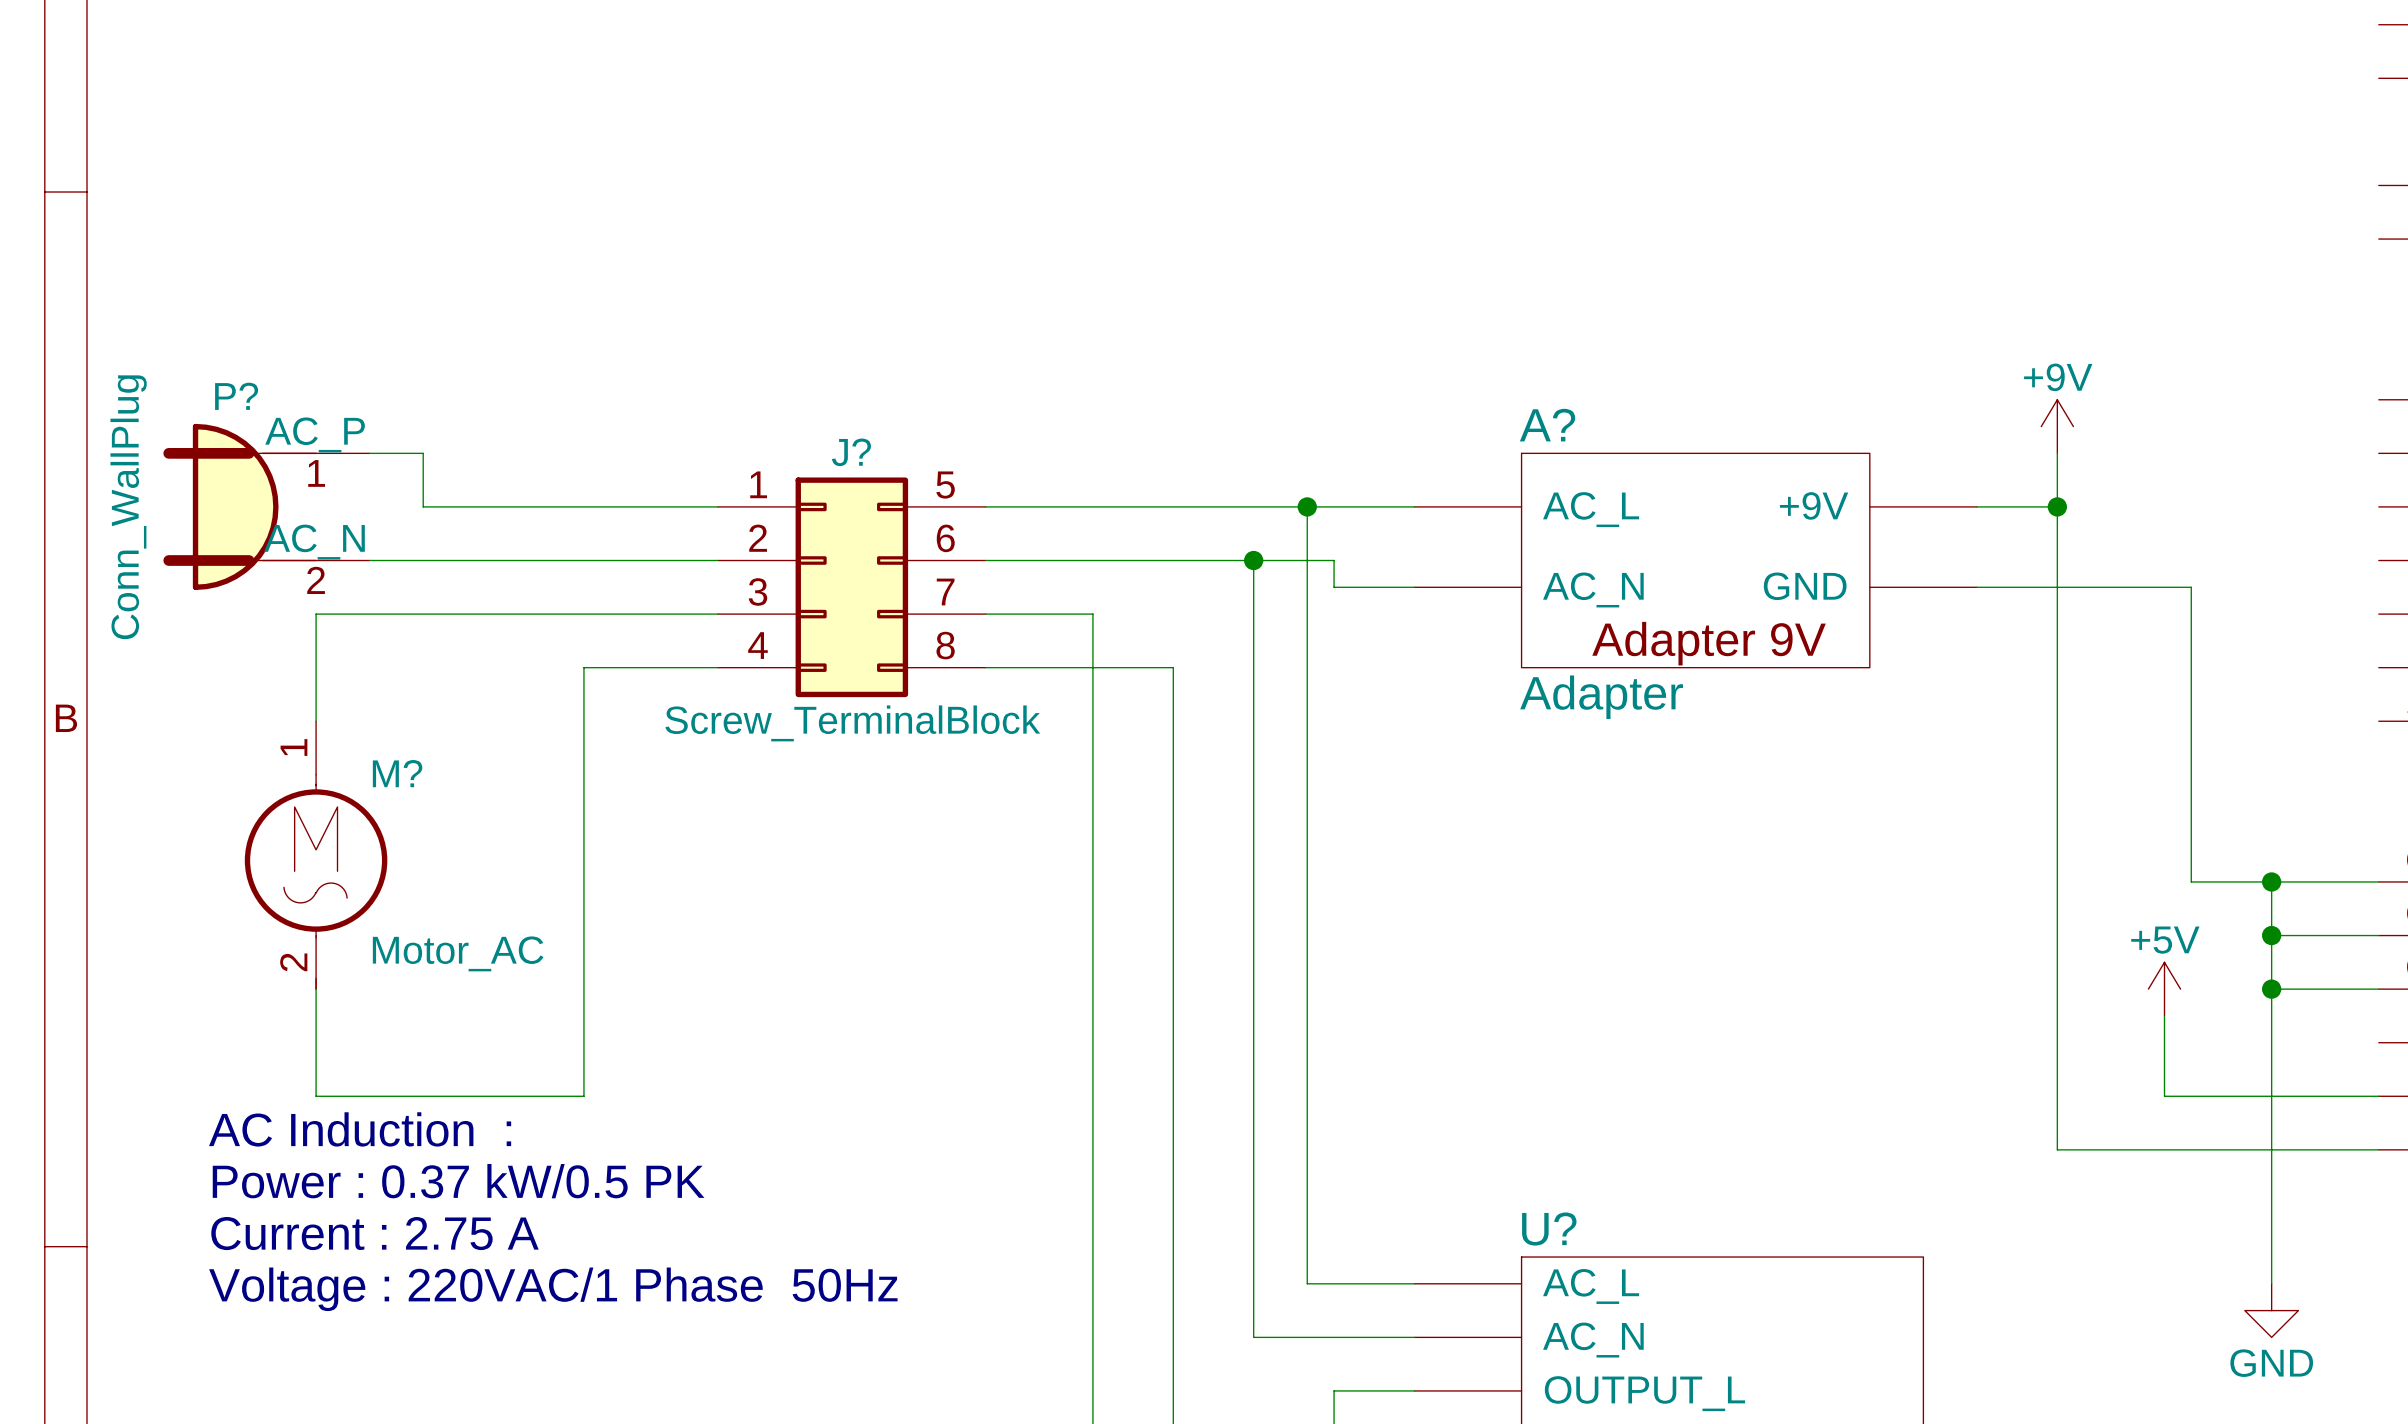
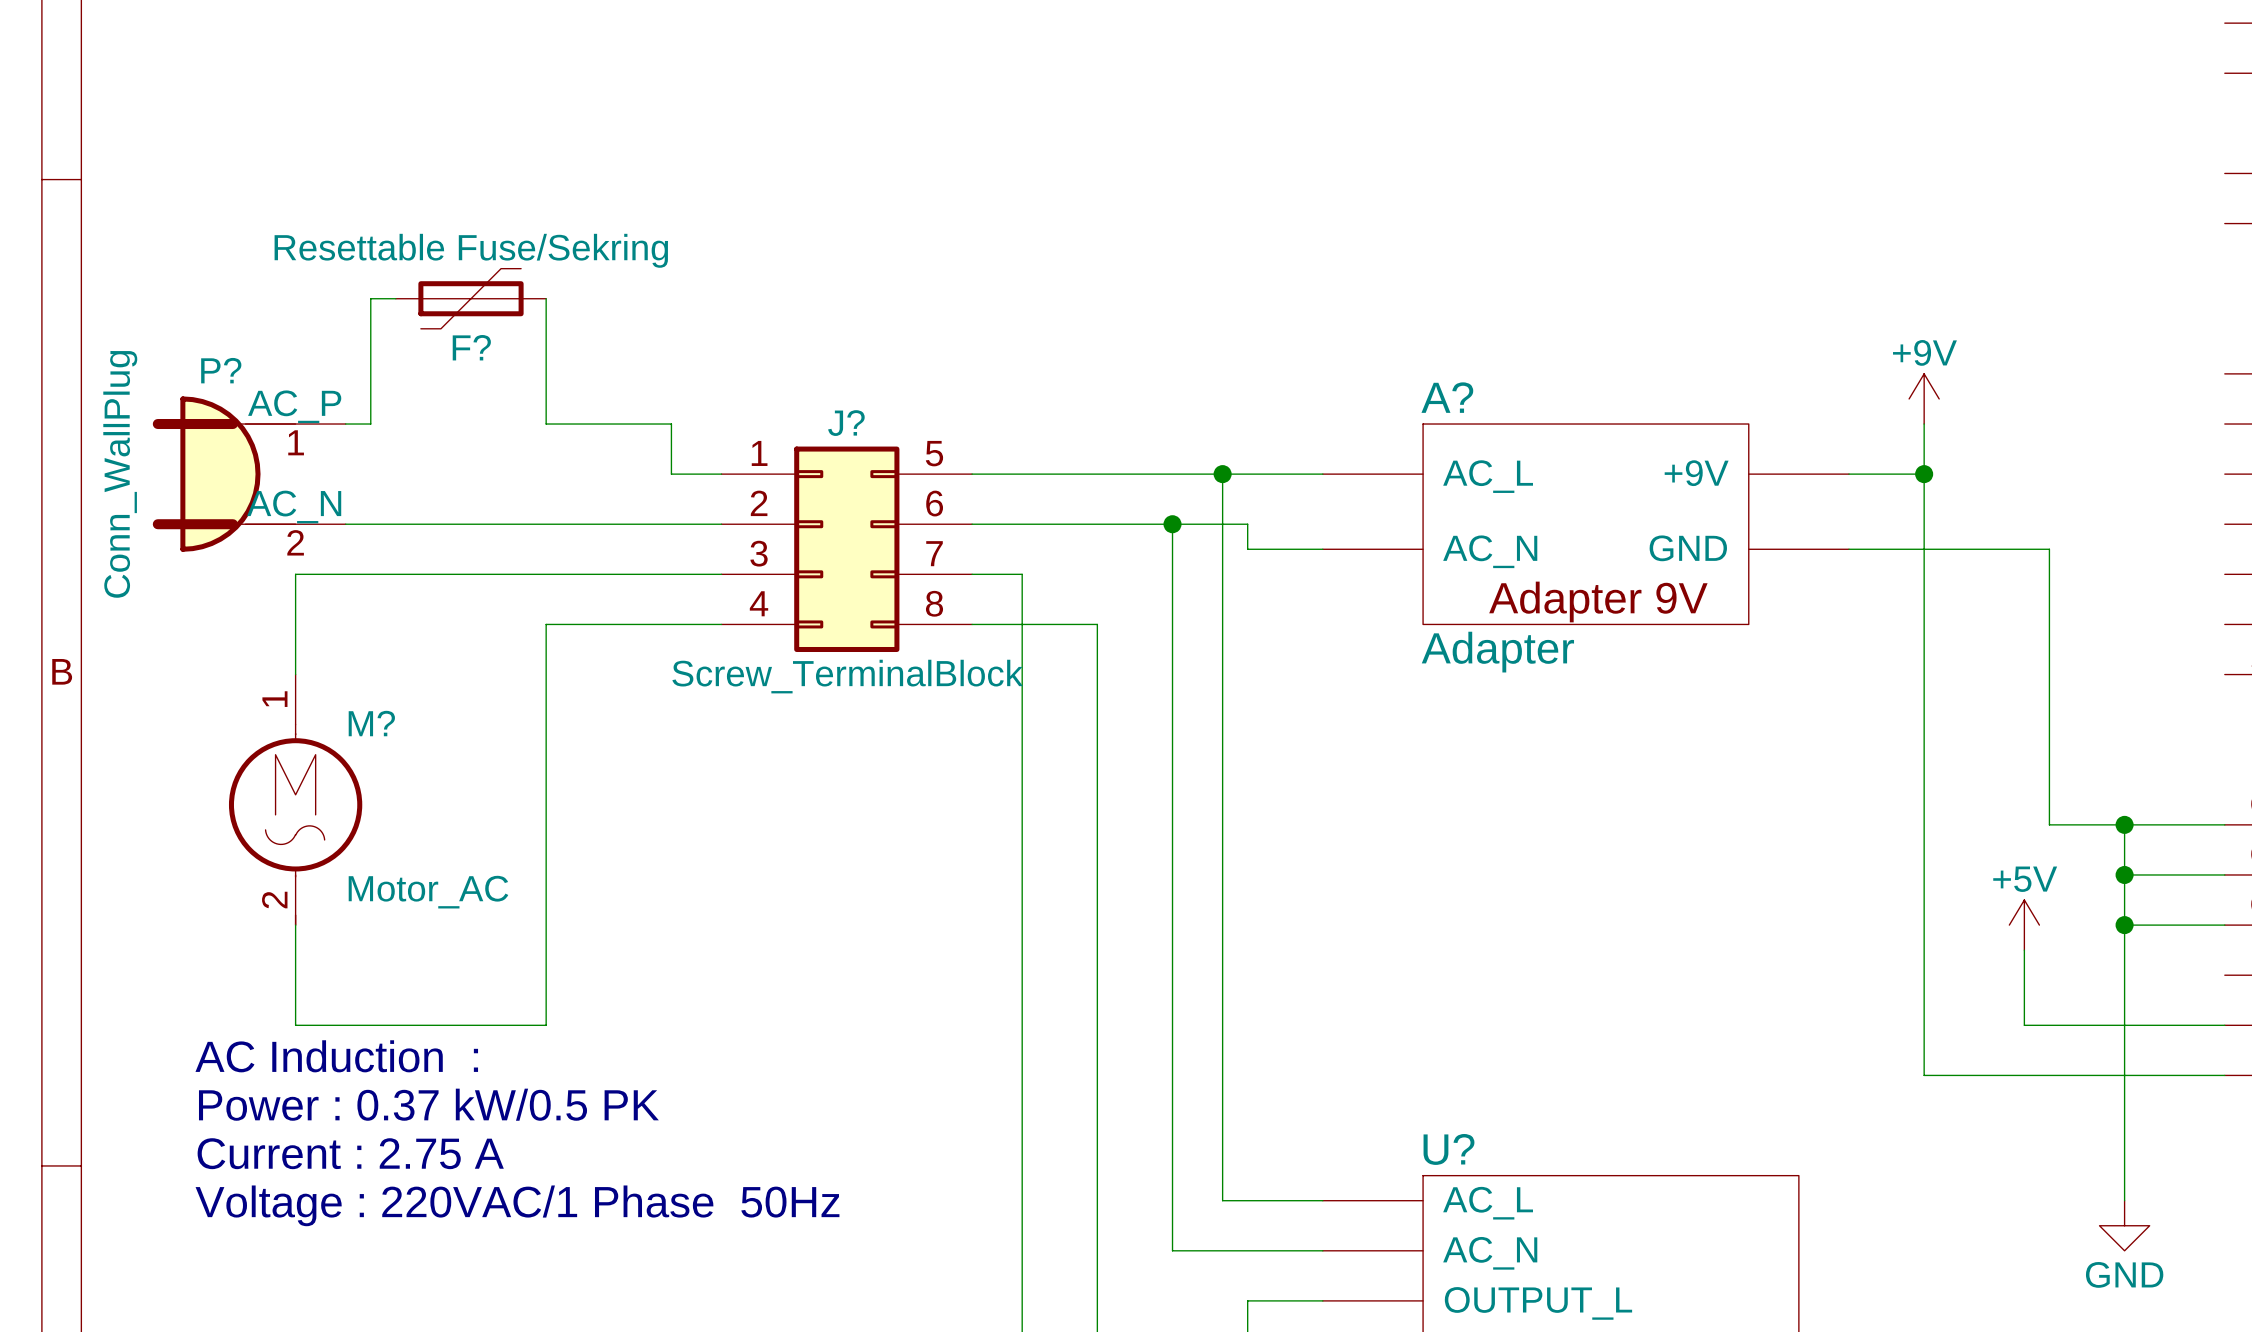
F?: none -> Resettable Fuse/Sekring (470, 298)
wire: none -> (546, 298) (546, 424) (671, 424) (671, 474) (721, 474)
wire: (396, 453) (423, 453) (423, 506) (717, 506) -> (370, 424) (370, 298) (395, 298)
J? position: (851, 587) -> (846, 549)

